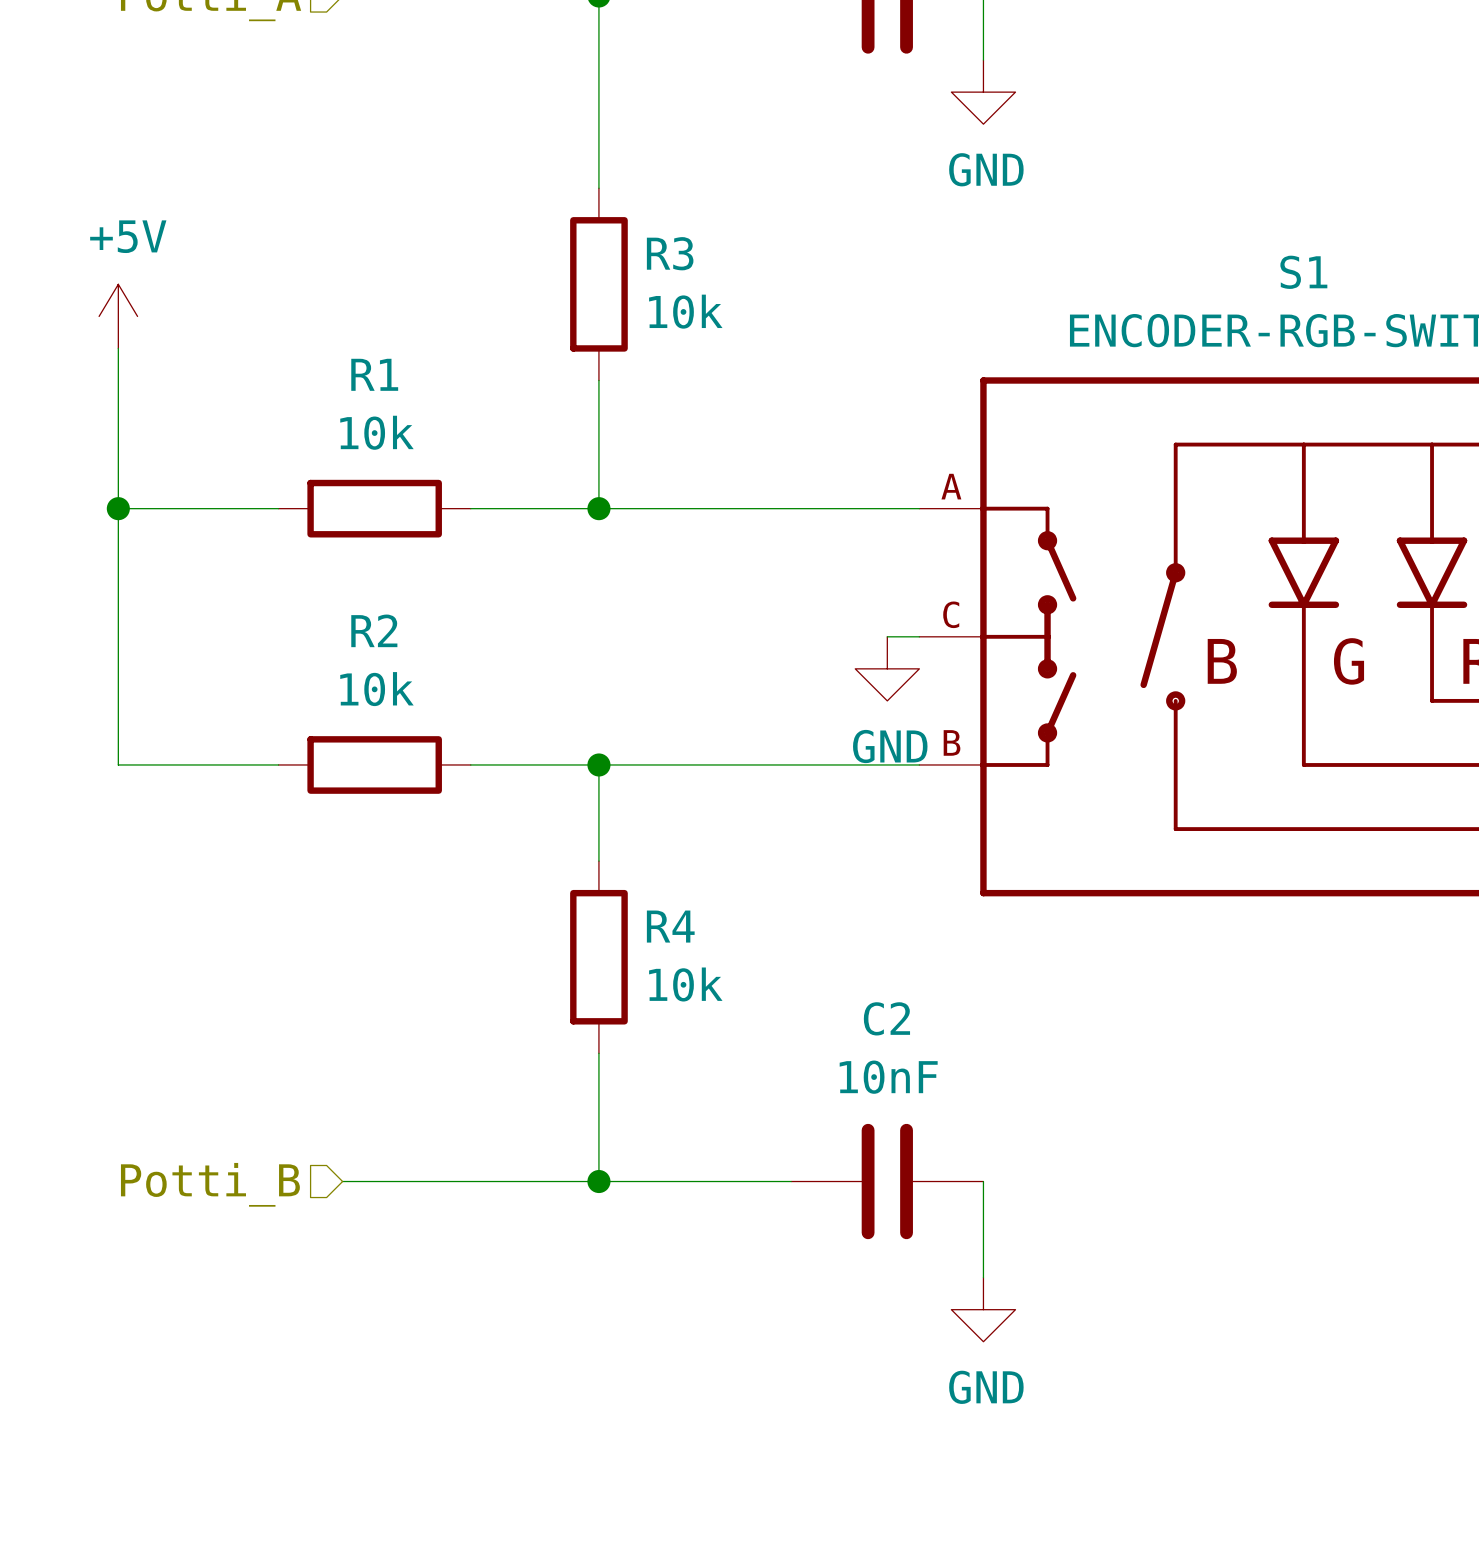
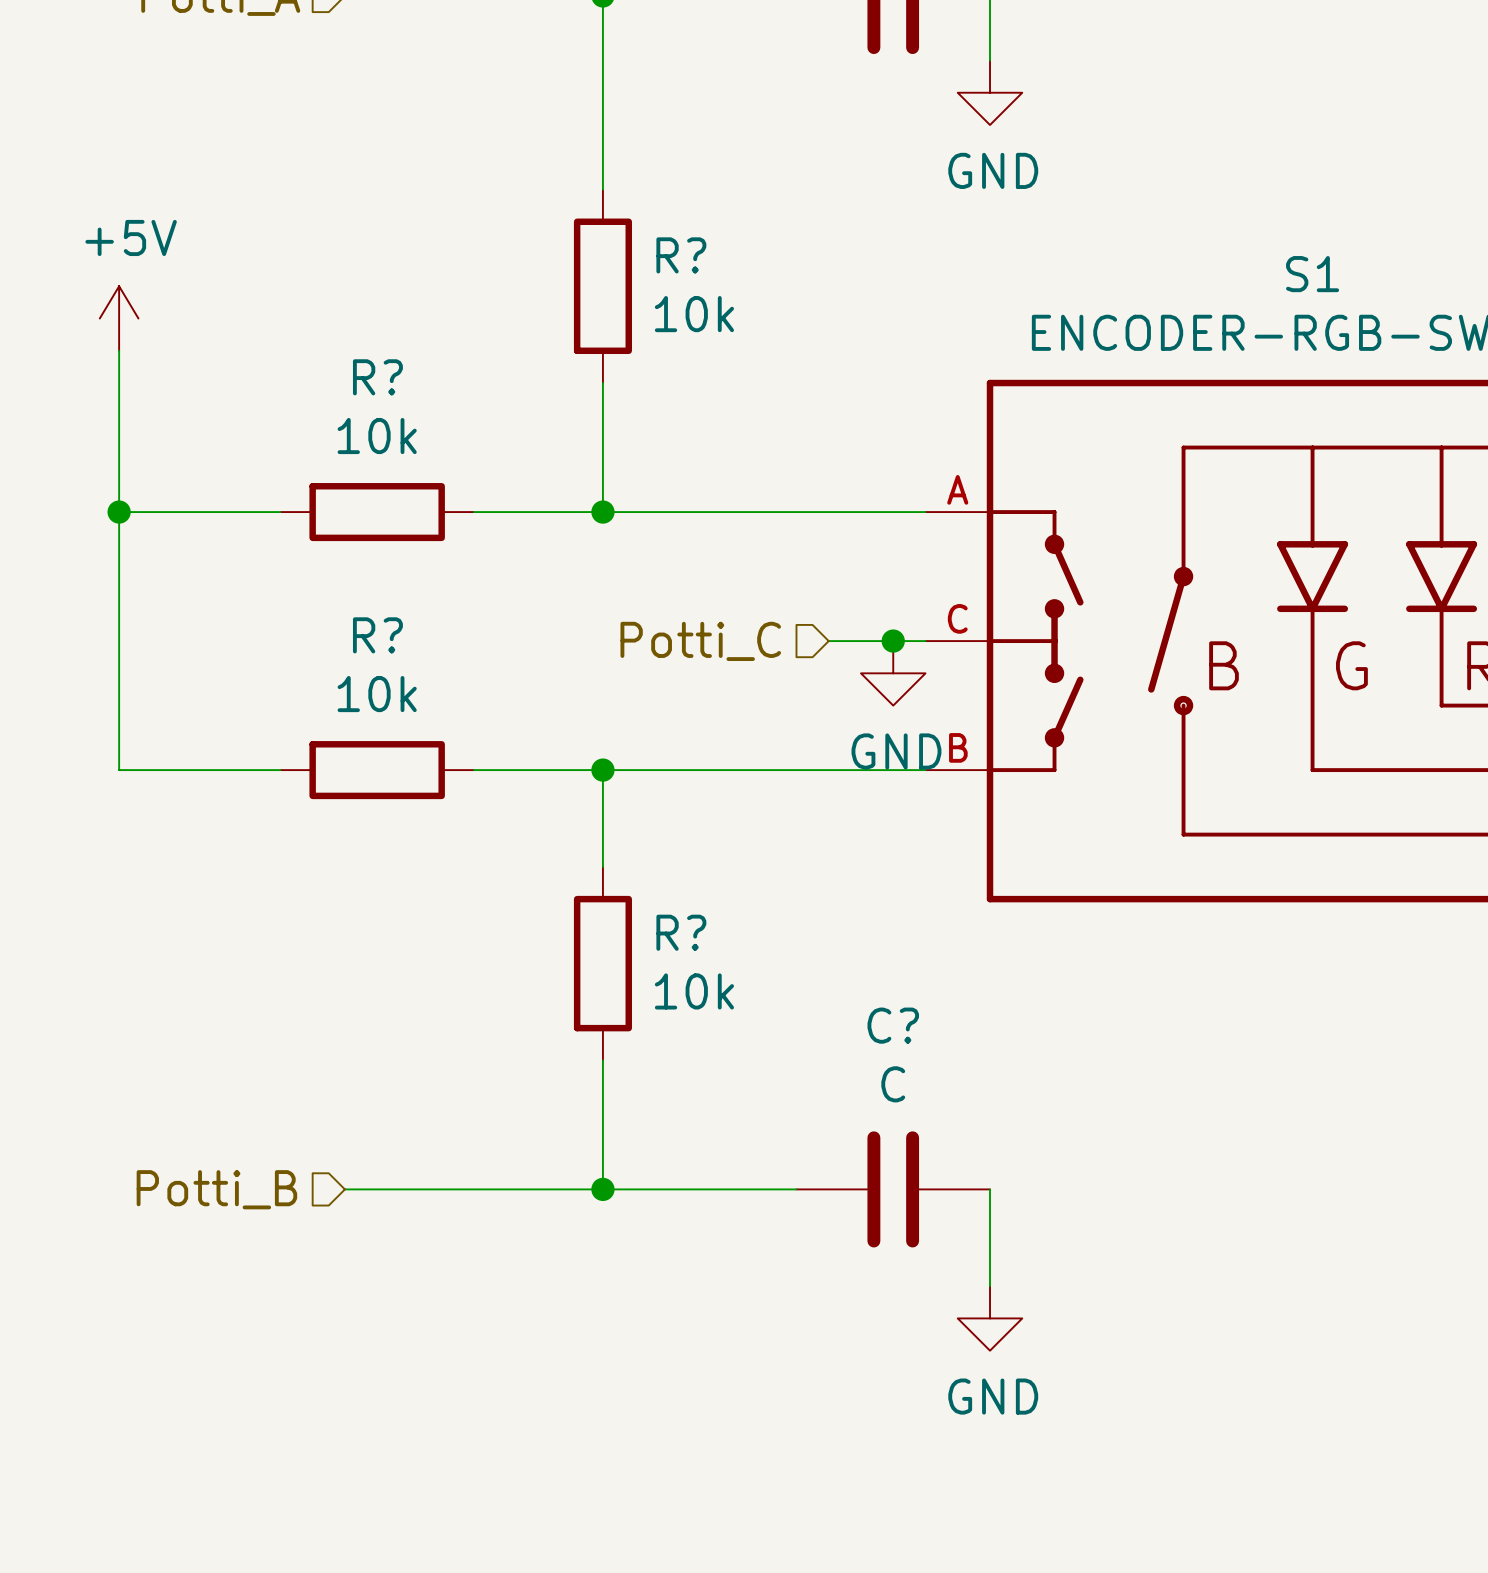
R3 name: R3 (670, 253) -> R? (681, 255)
R1 name: R1 (374, 374) -> R? (377, 377)
R2 name: R2 (374, 630) -> R? (377, 635)
wire: none -> (828, 641) (893, 641)
junction: none -> (893, 641)
hierarchical label: none -> Potti_C (700, 641)
R4 name: R4 (670, 926) -> R? (681, 932)
C2 name: C2 (886, 1018) -> C? (893, 1025)
C2 value: 10nF (888, 1077) -> C (893, 1084)

